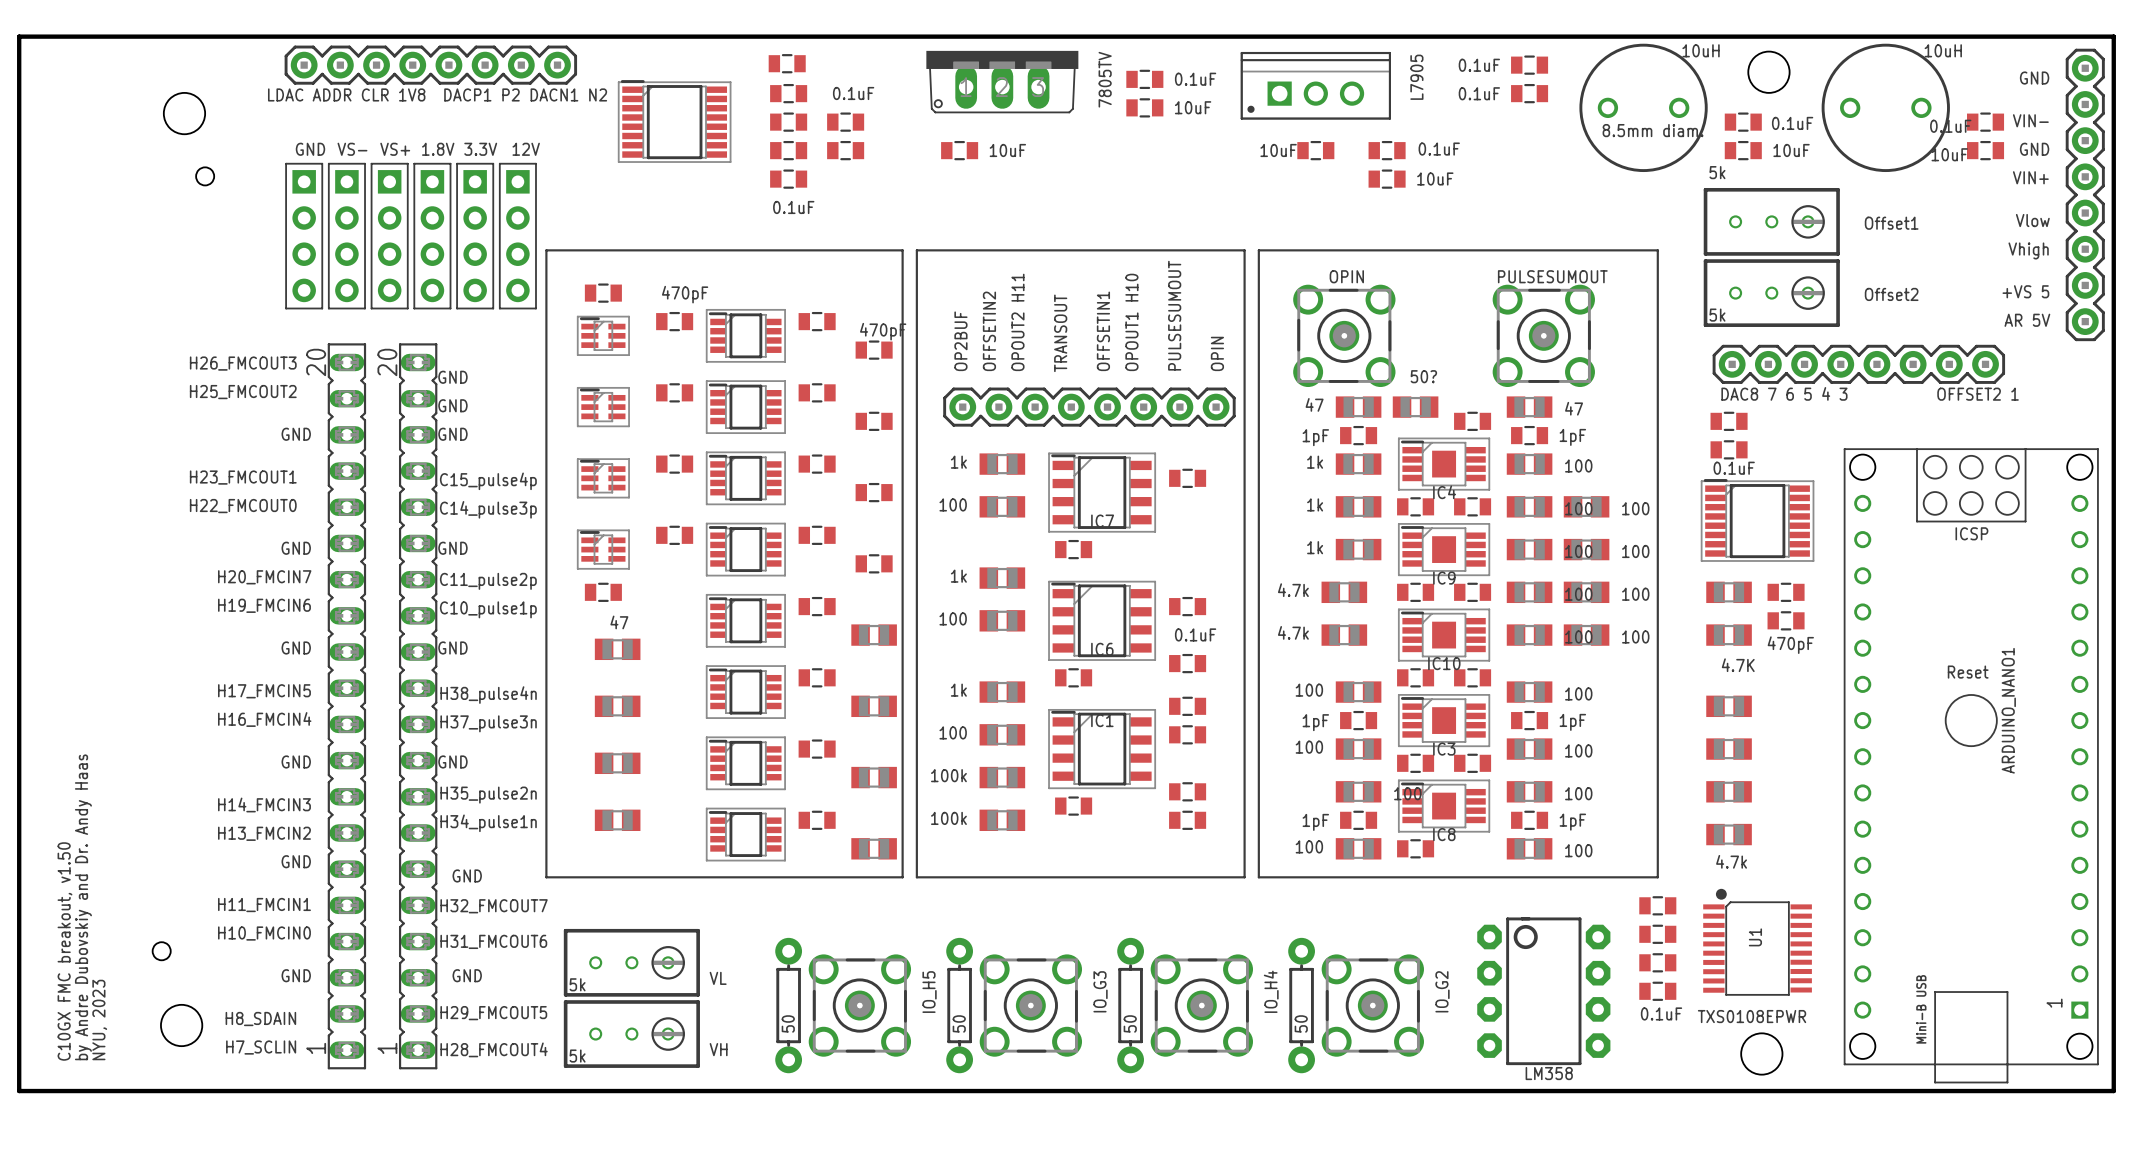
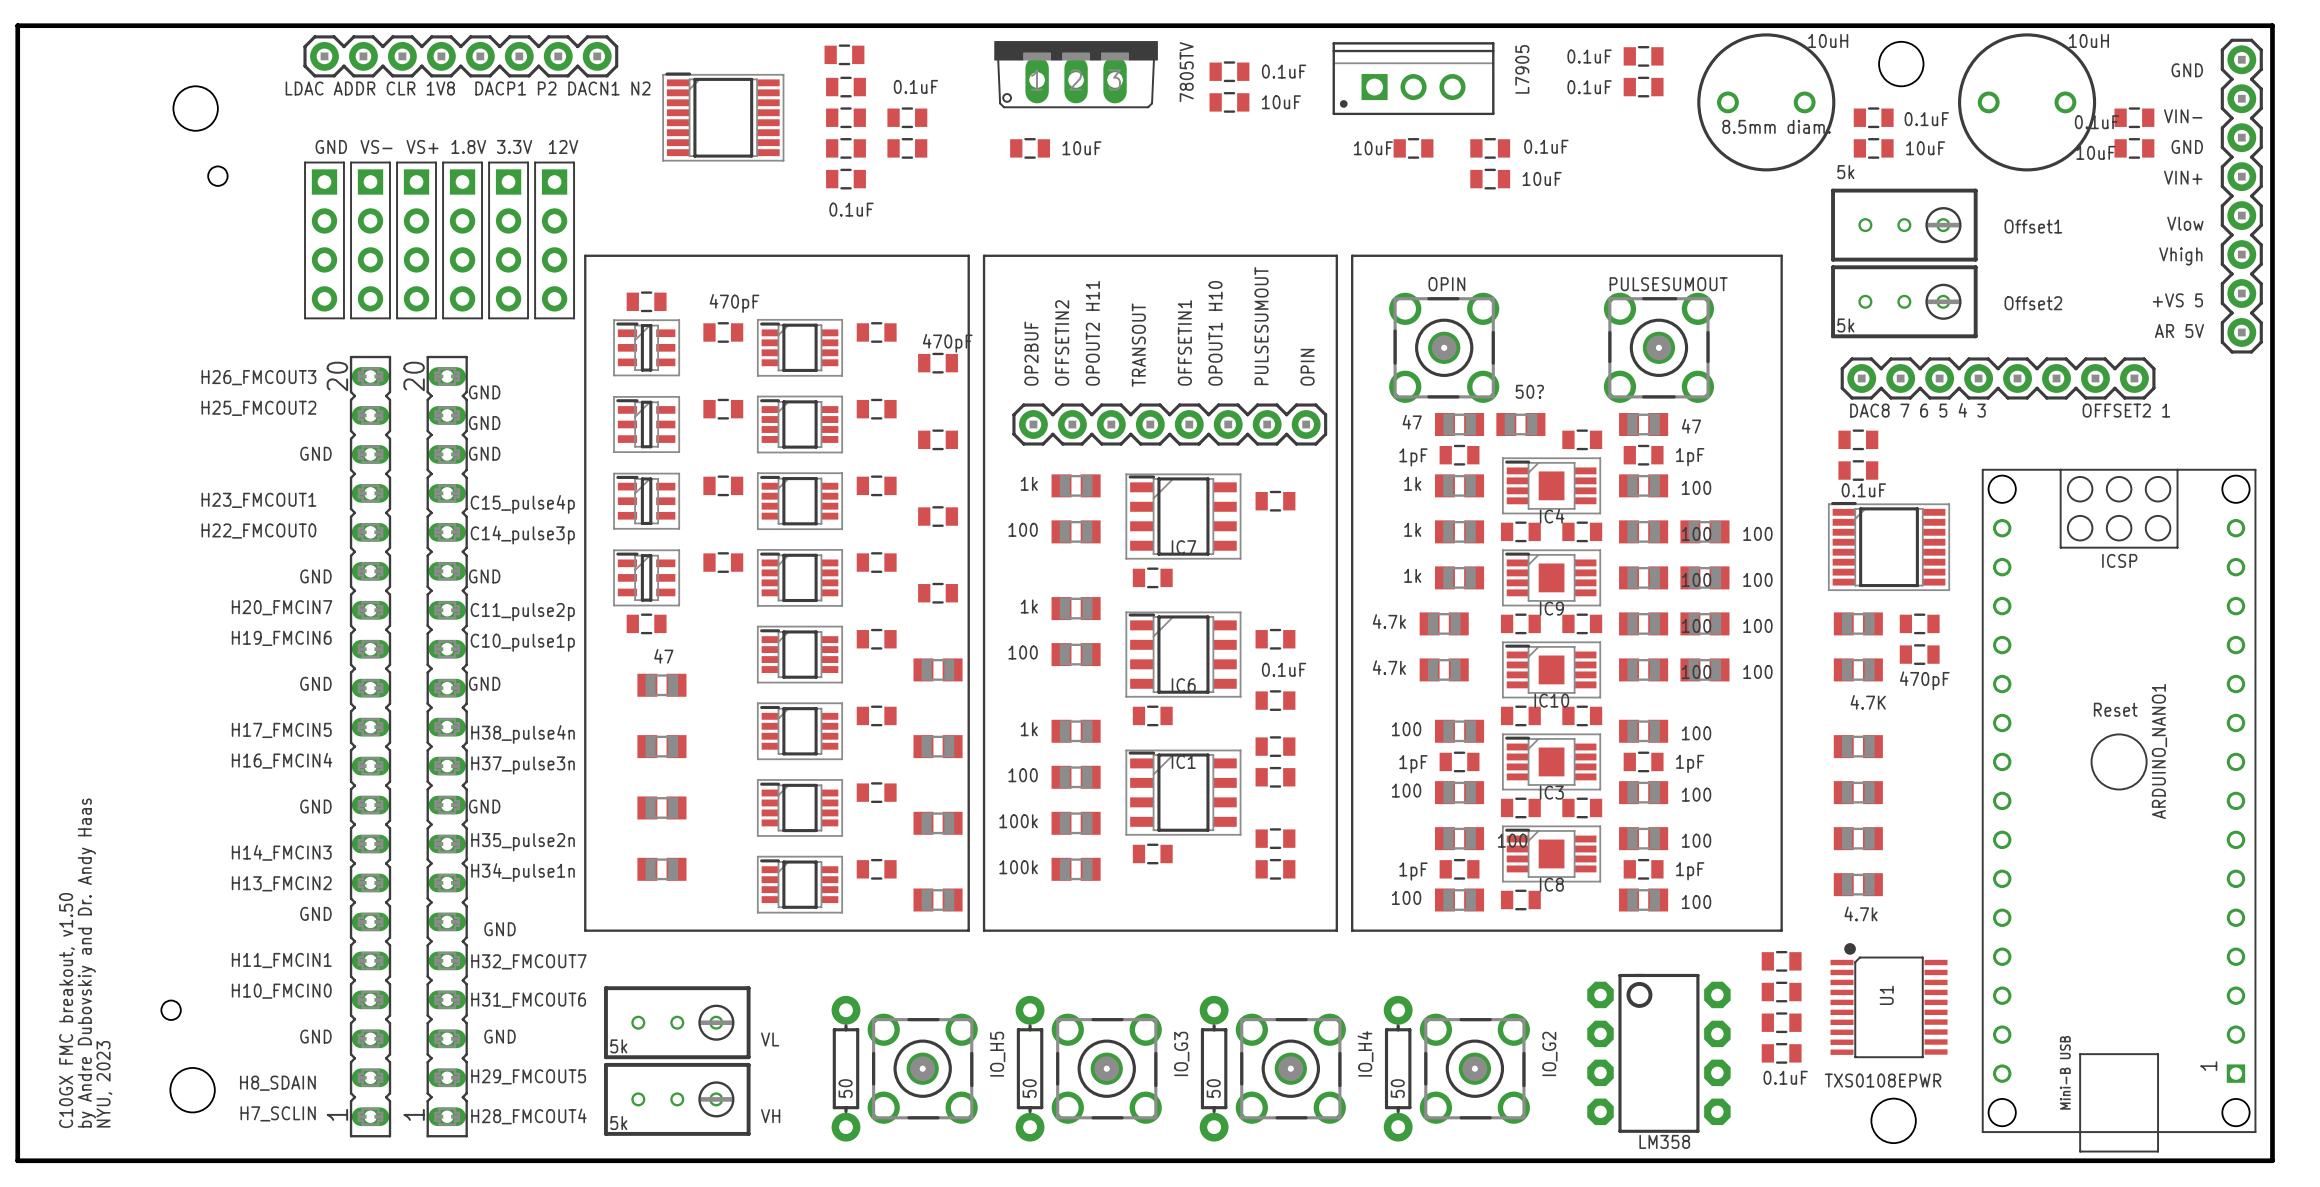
part footprint: [577, 316, 630, 356] -> [613, 319, 680, 376]
part footprint: [577, 387, 630, 427] -> [613, 396, 680, 453]
part footprint: [577, 458, 630, 498] -> [613, 473, 680, 530]
part footprint: [577, 529, 630, 570] -> [613, 549, 680, 606]

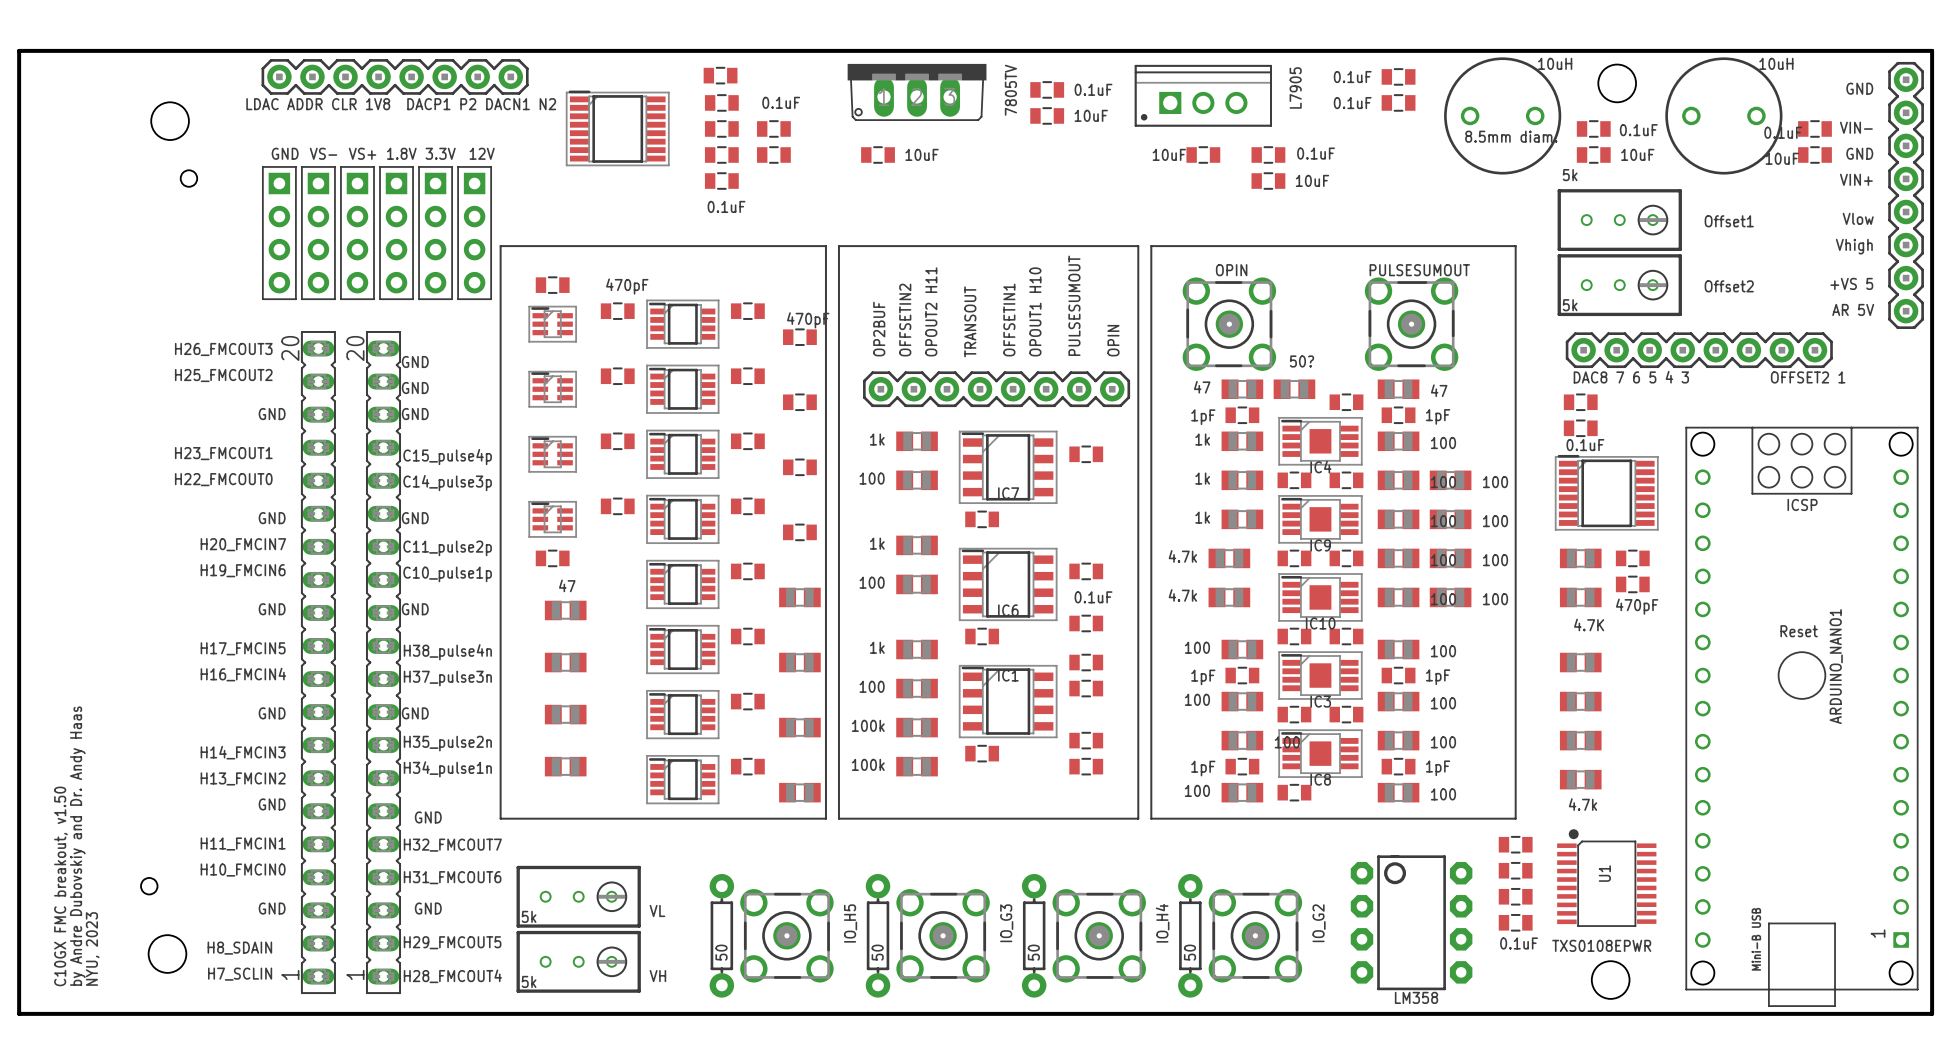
part footprint: [613, 319, 680, 376] -> [528, 306, 577, 343]
part footprint: [613, 396, 680, 453] -> [528, 371, 577, 408]
part footprint: [613, 473, 680, 530] -> [528, 436, 577, 473]
part footprint: [613, 549, 680, 606] -> [528, 501, 577, 538]

